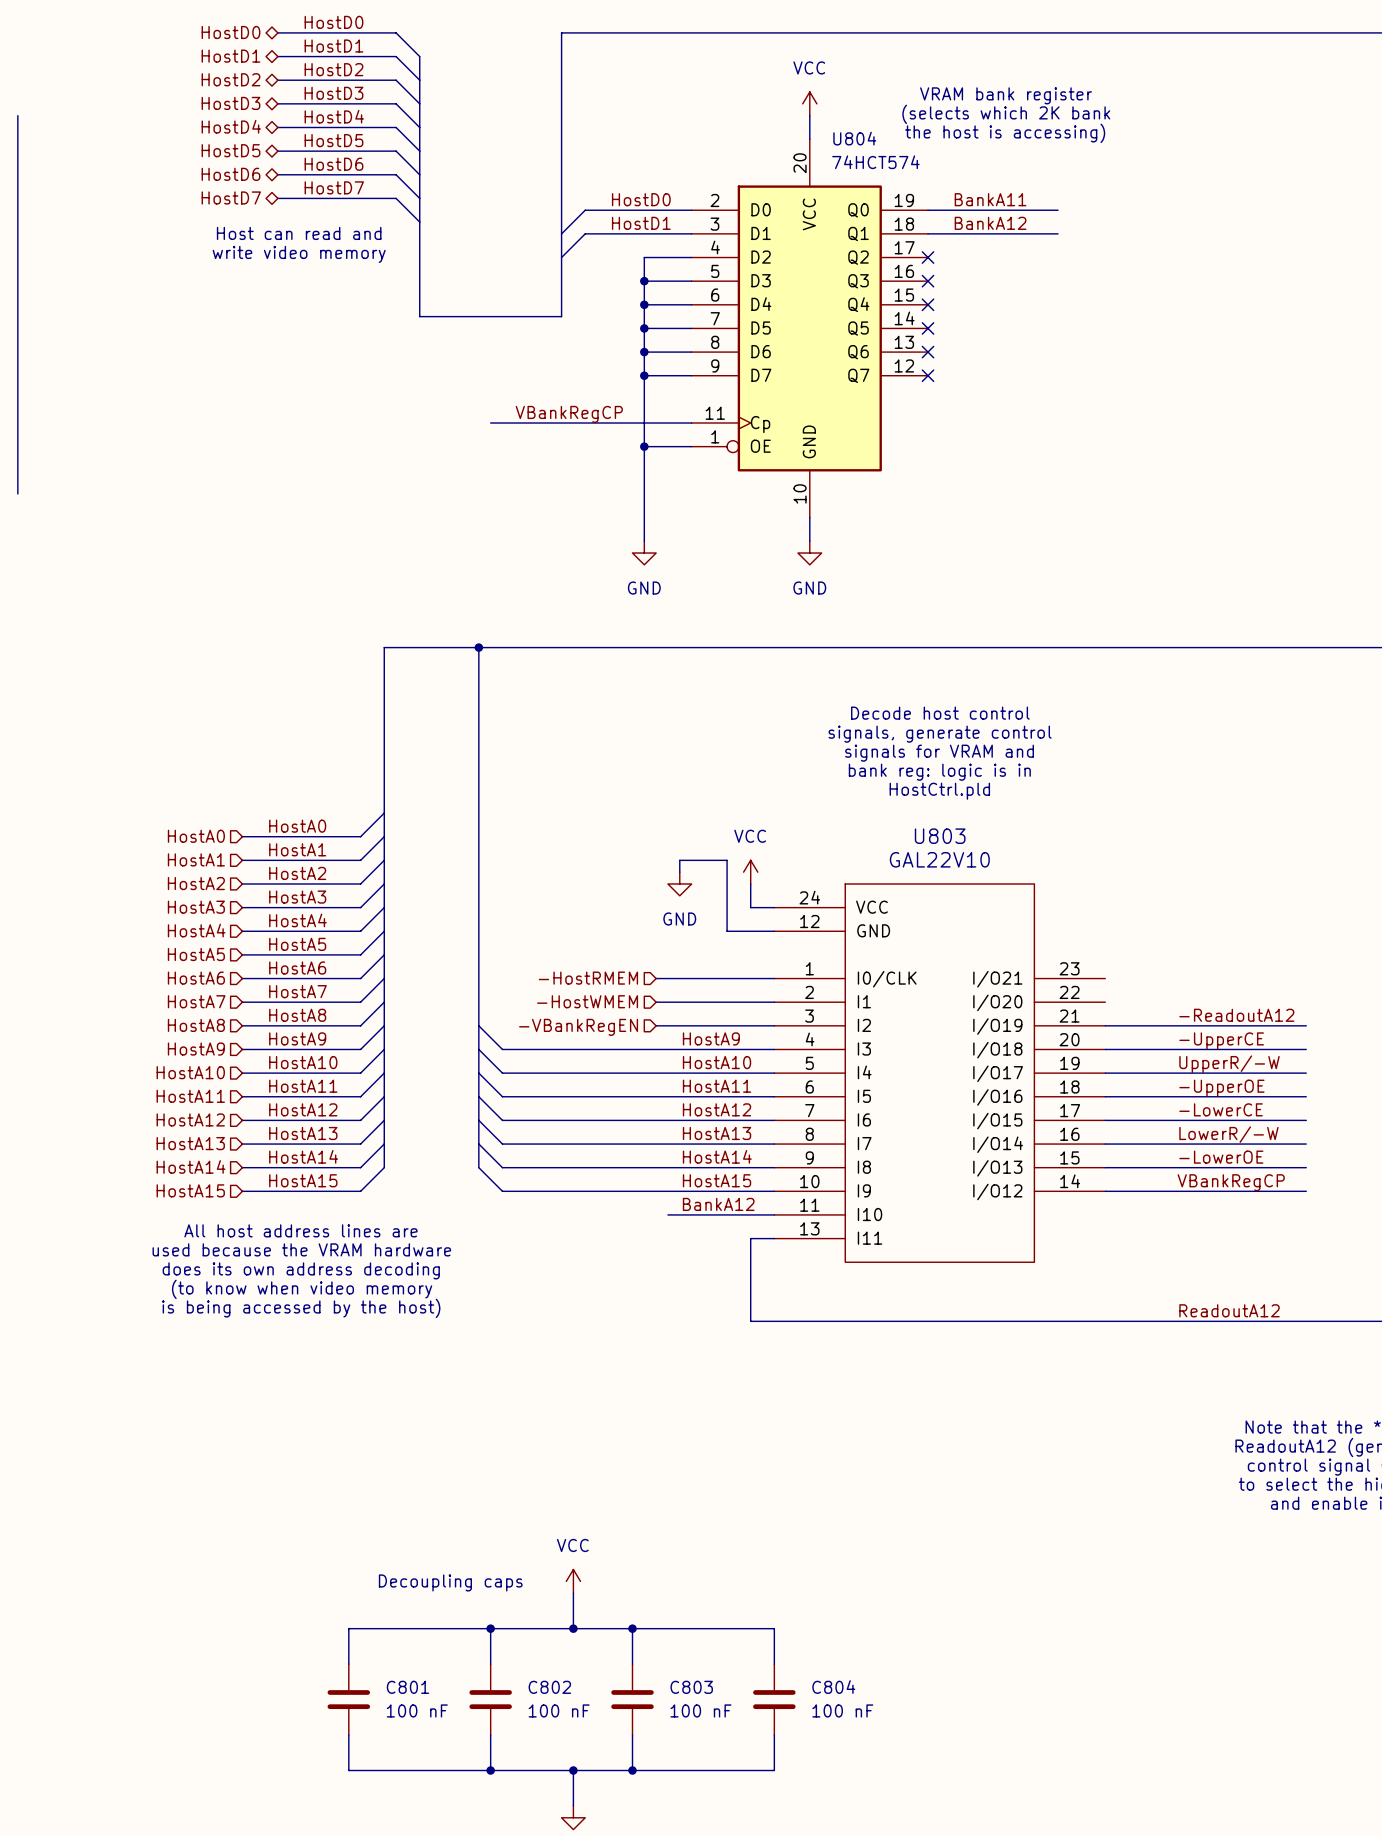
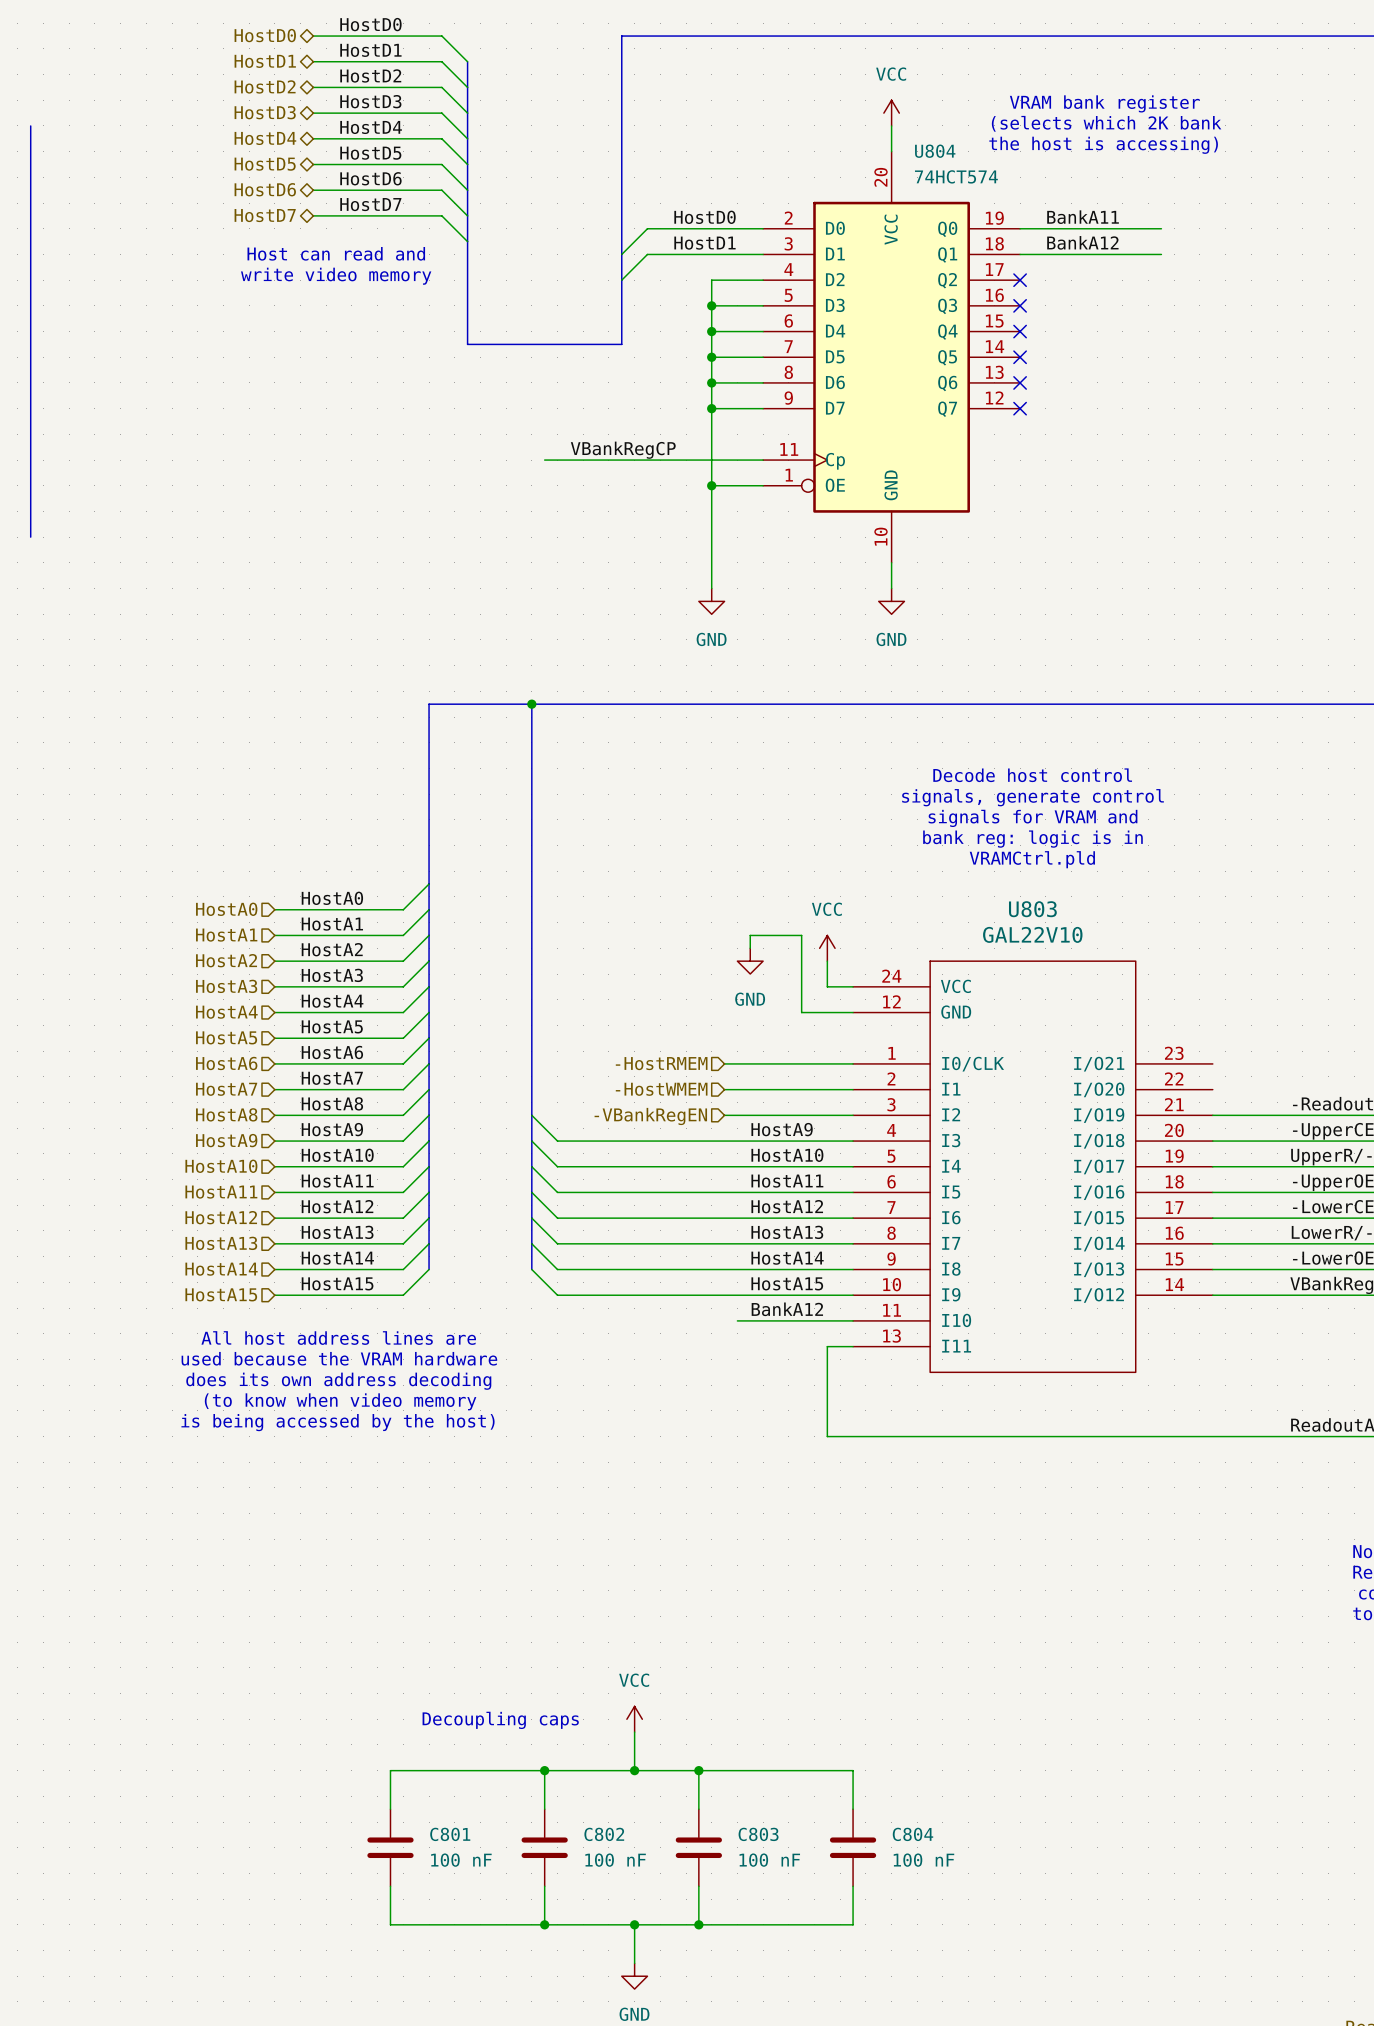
text: HostCtrl.pld (939, 791) -> VRAMCtrl.pld (1032, 859)

